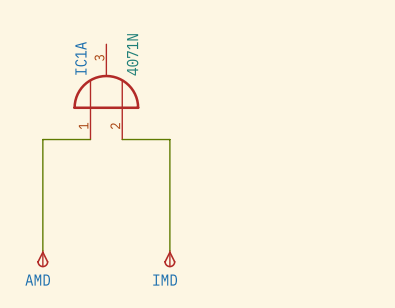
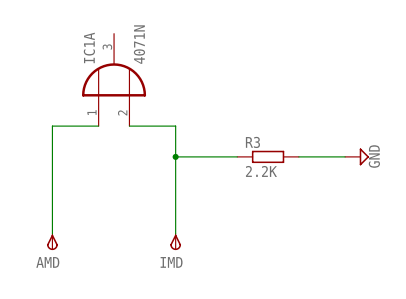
wire: none -> (175, 156) (237, 156)
junction: none -> (175, 156)
R3: none -> 2.2K (268, 156)
wire: none -> (298, 156) (345, 156)
power symbol: none -> GND (357, 156)

